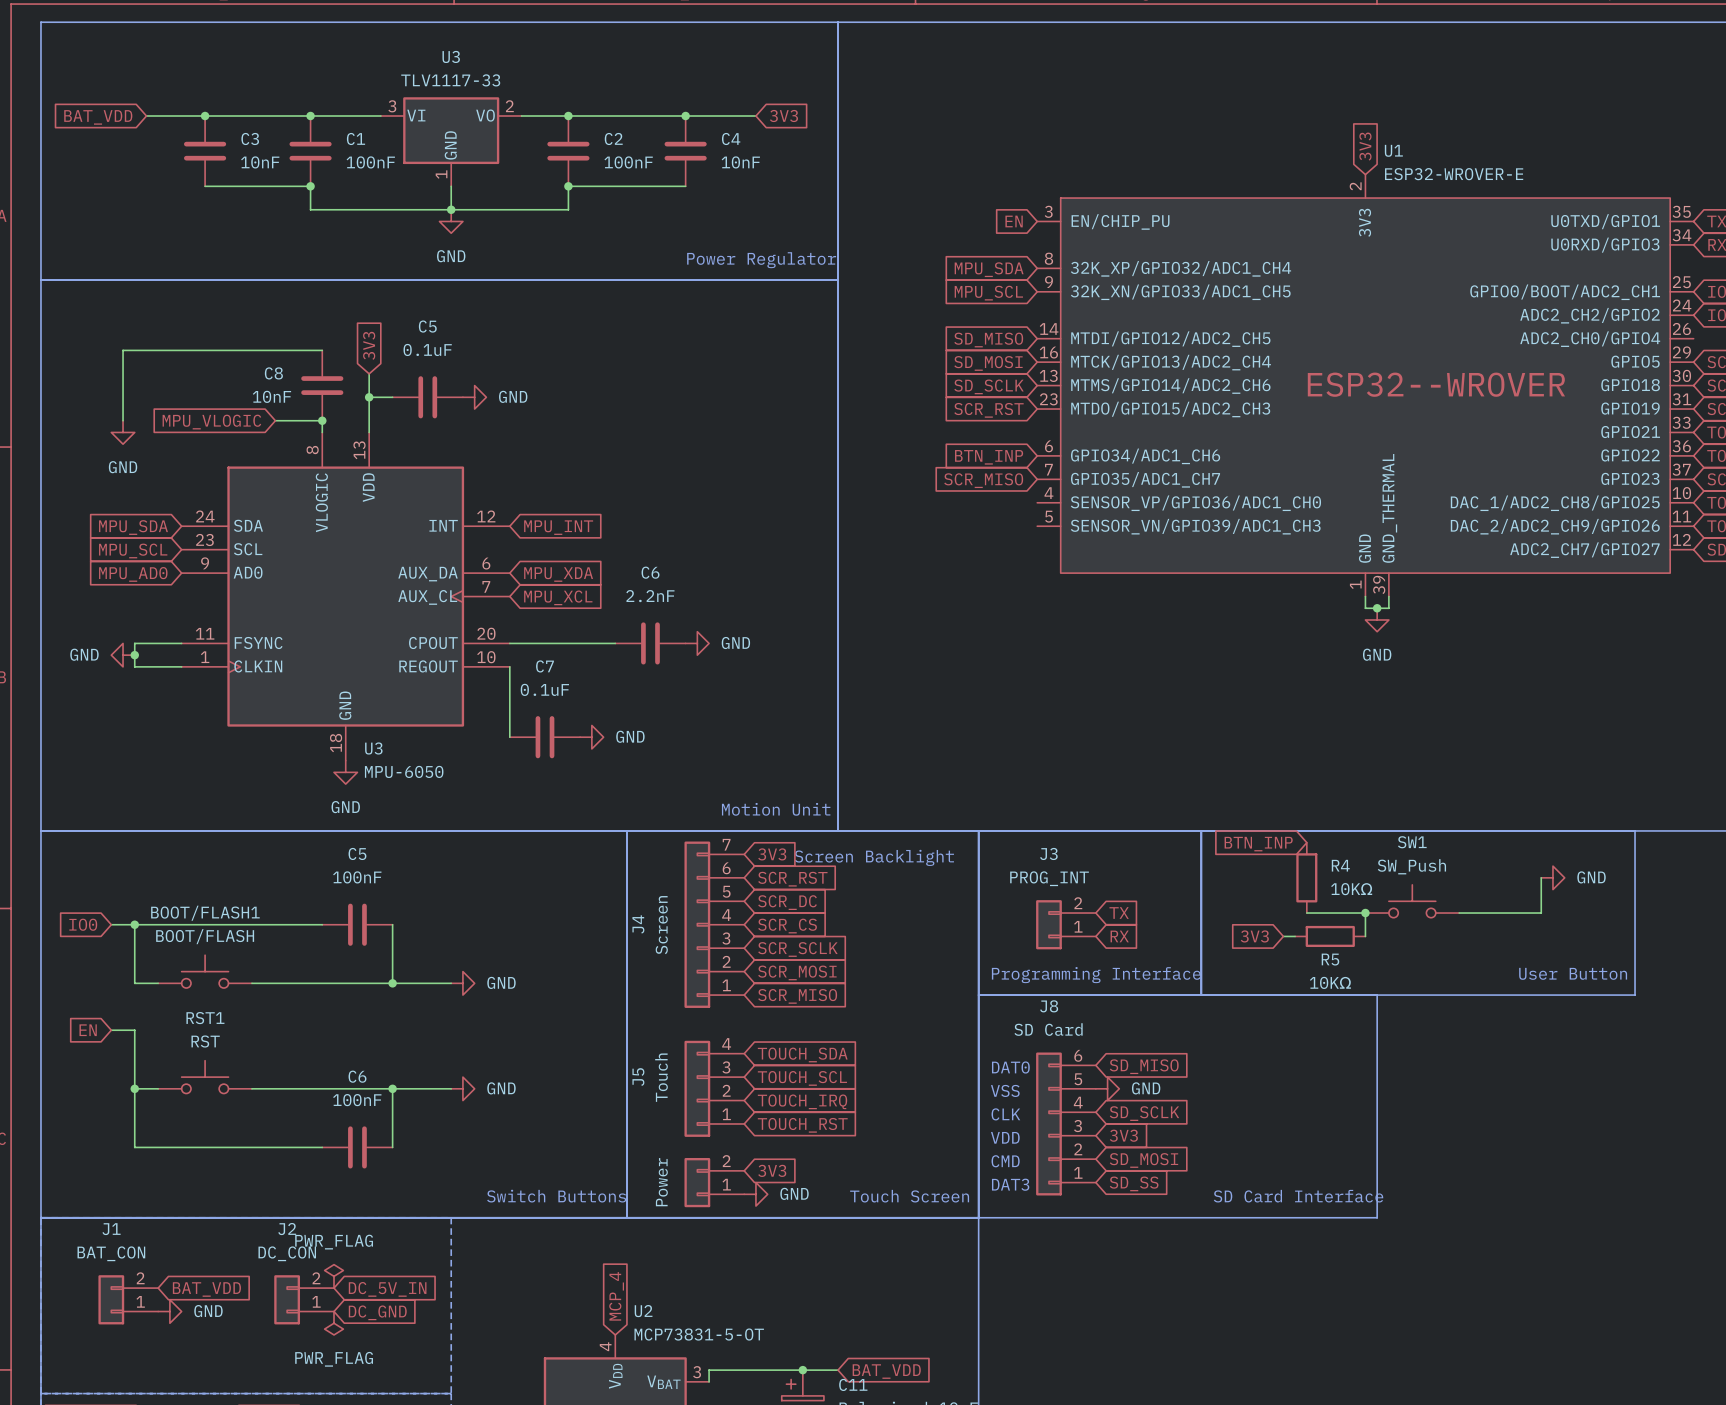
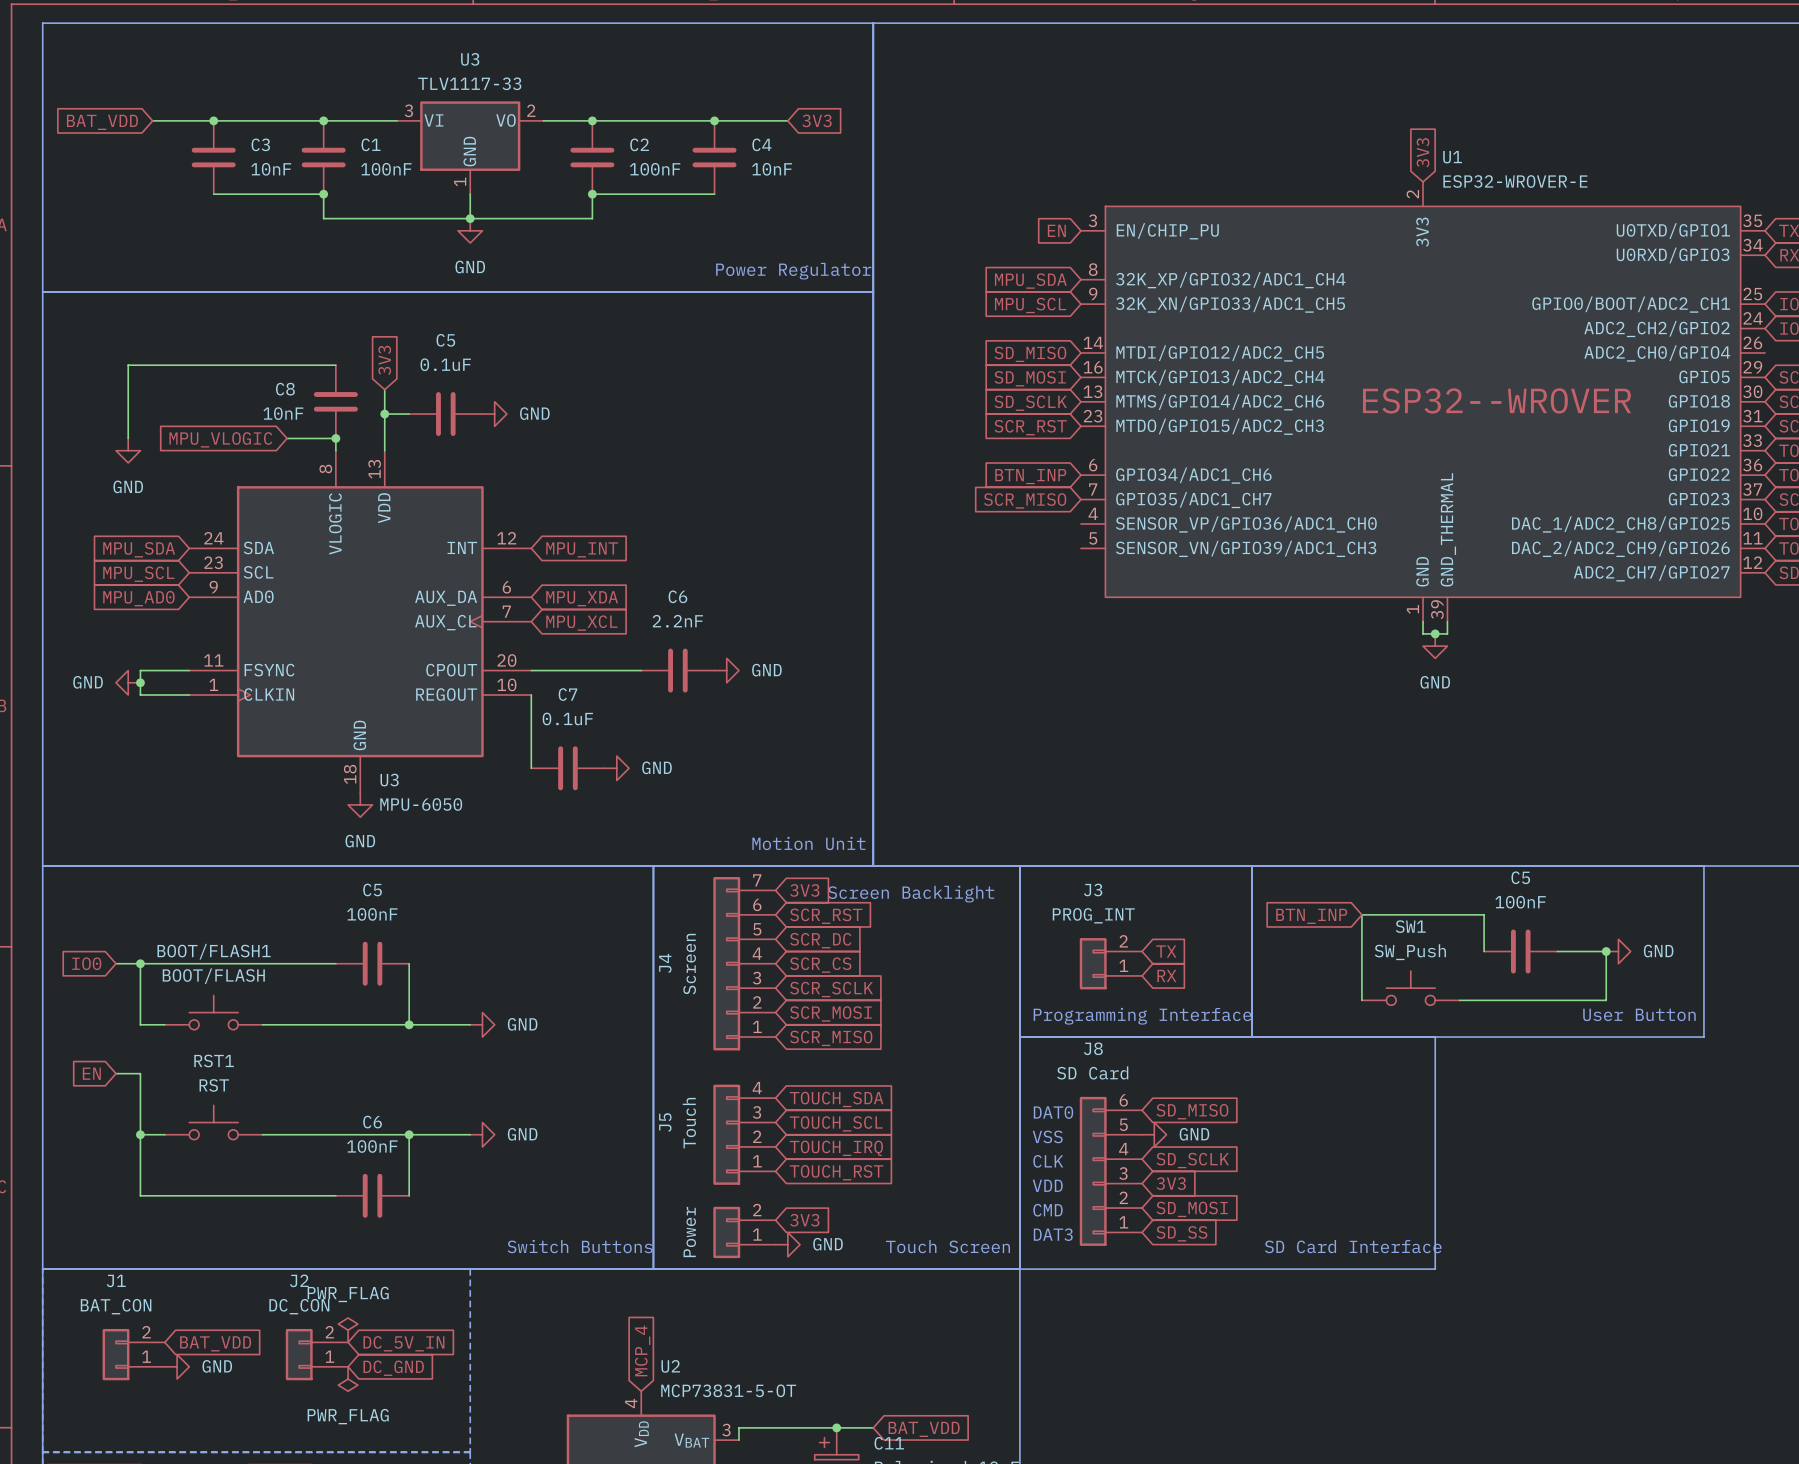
global label position: BTN_INP (1258, 844) -> BTN_INP (1311, 916)
R4: 10KΩ (1306, 877) -> none
wire: (1541, 877) (1541, 913) -> (1459, 1000) (1606, 1000) (1606, 951)
power symbol position: GND (1552, 877) -> GND (1618, 951)
SW1 position: (1412, 901) -> (1410, 988)
wire: (1306, 913) (1365, 913) (1365, 936) -> none
junction: (1365, 913) -> none
wire: none -> (1484, 951) (1484, 914) (1361, 914) (1361, 1000)
C5: none -> 100nF (1520, 951)
junction: none -> (1606, 951)
global label: 3V3 (1254, 936) -> none
wire: (1283, 936) (1295, 936) -> none
R5: 10KΩ (1330, 936) -> none

